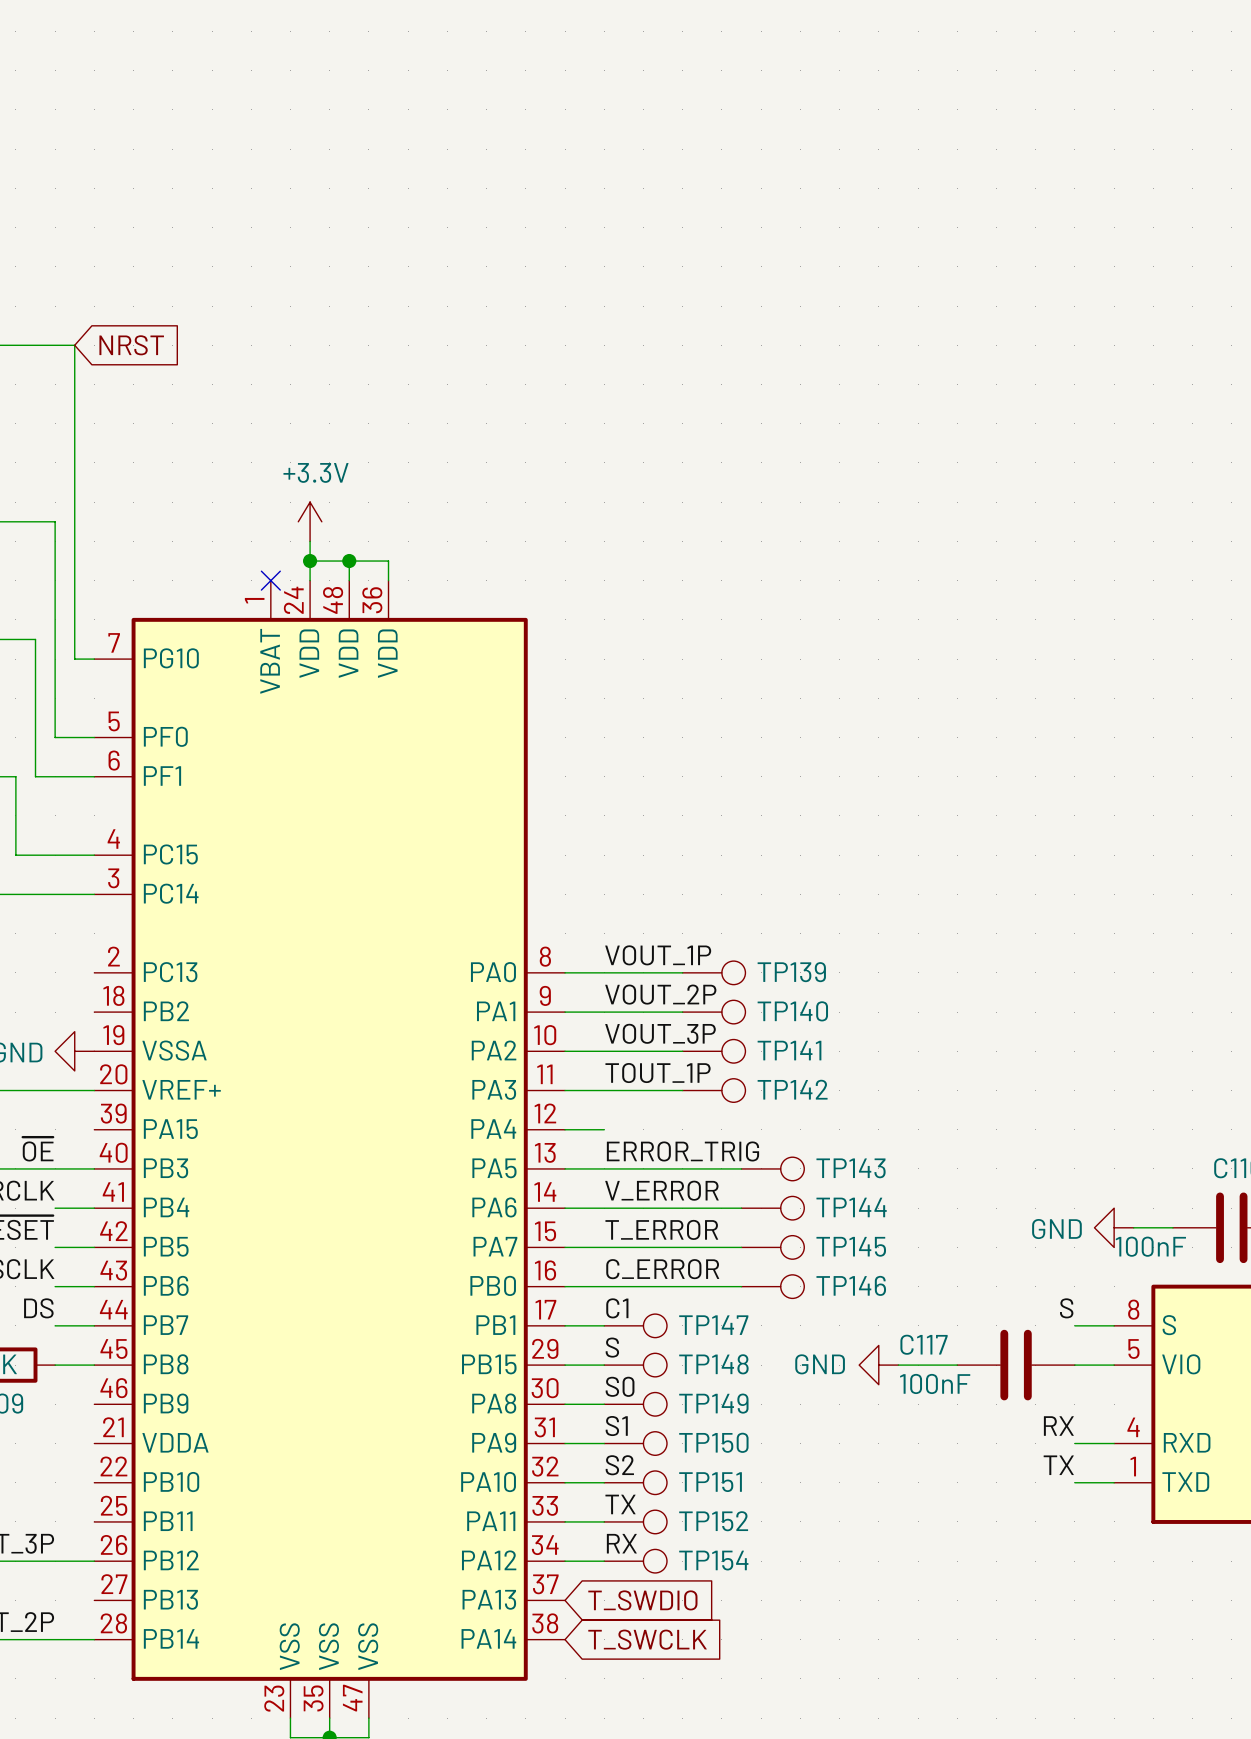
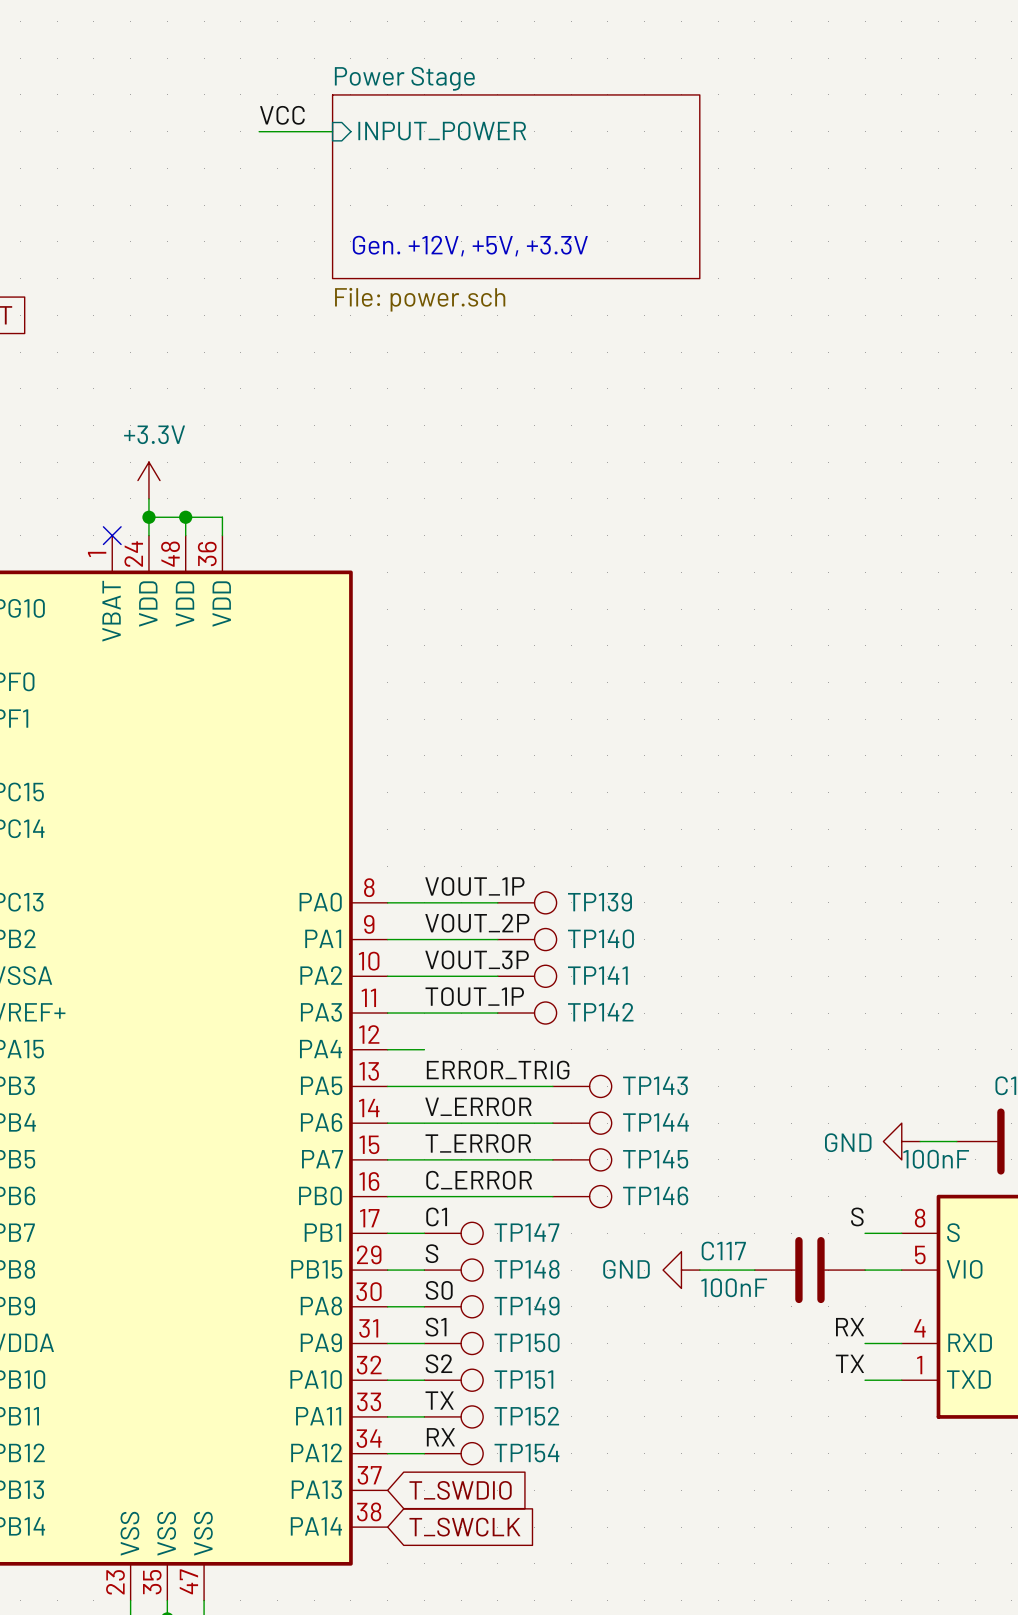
label: none -> VCC (282, 115)
sheet pin: none -> INPUT_POWER (442, 131)
wire: none -> (259, 131) (332, 131)
sheet Power Stage: none -> File: power.sch (516, 186)
text: none -> Gen. +12V, +5V, +3.3V (470, 246)

